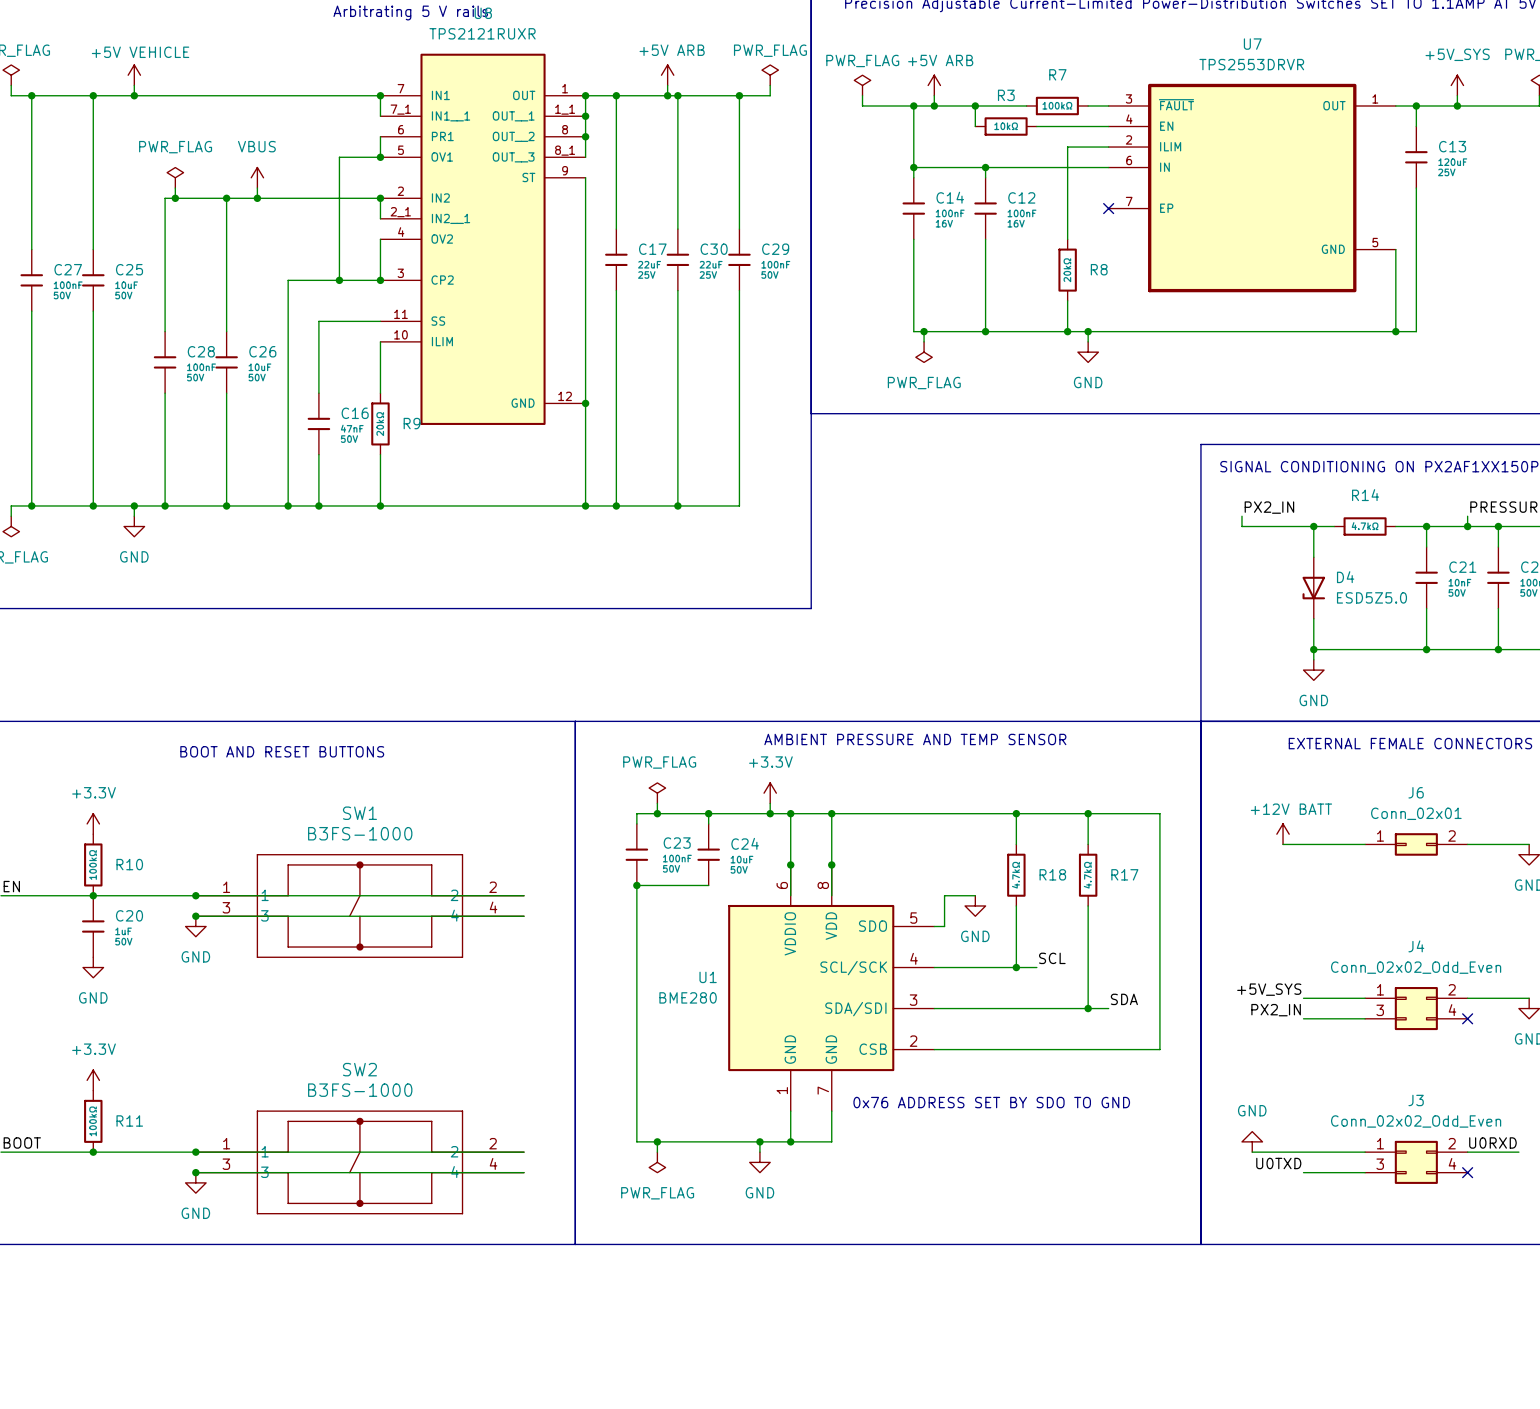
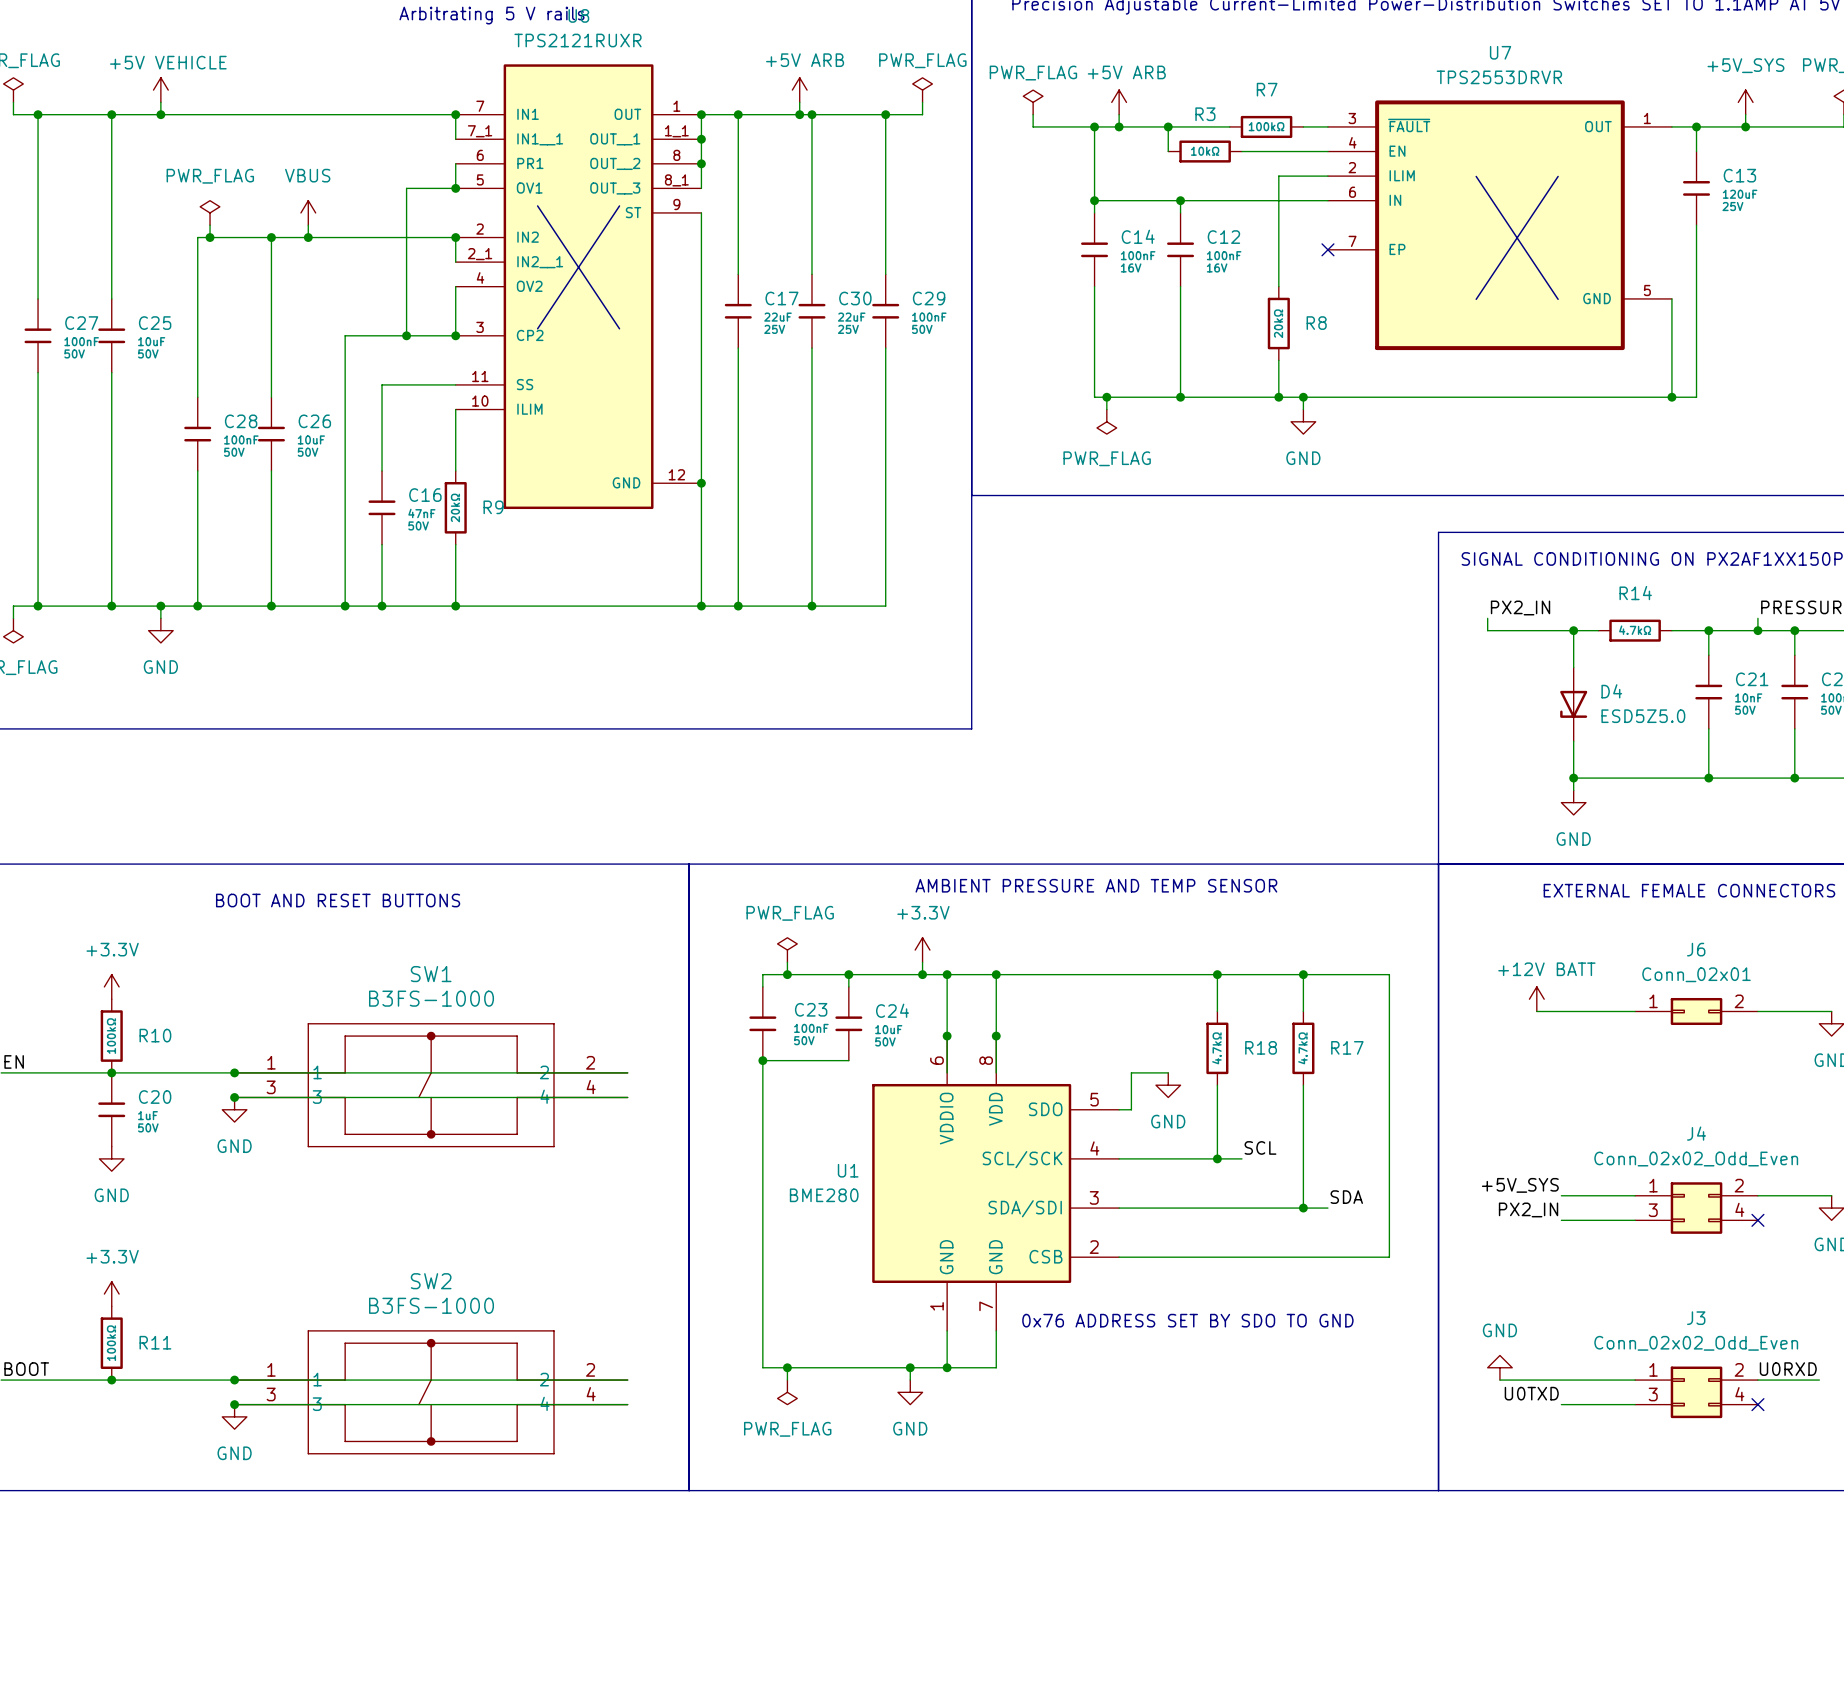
text: none -> X (1517, 237)
text: none -> X (578, 267)

